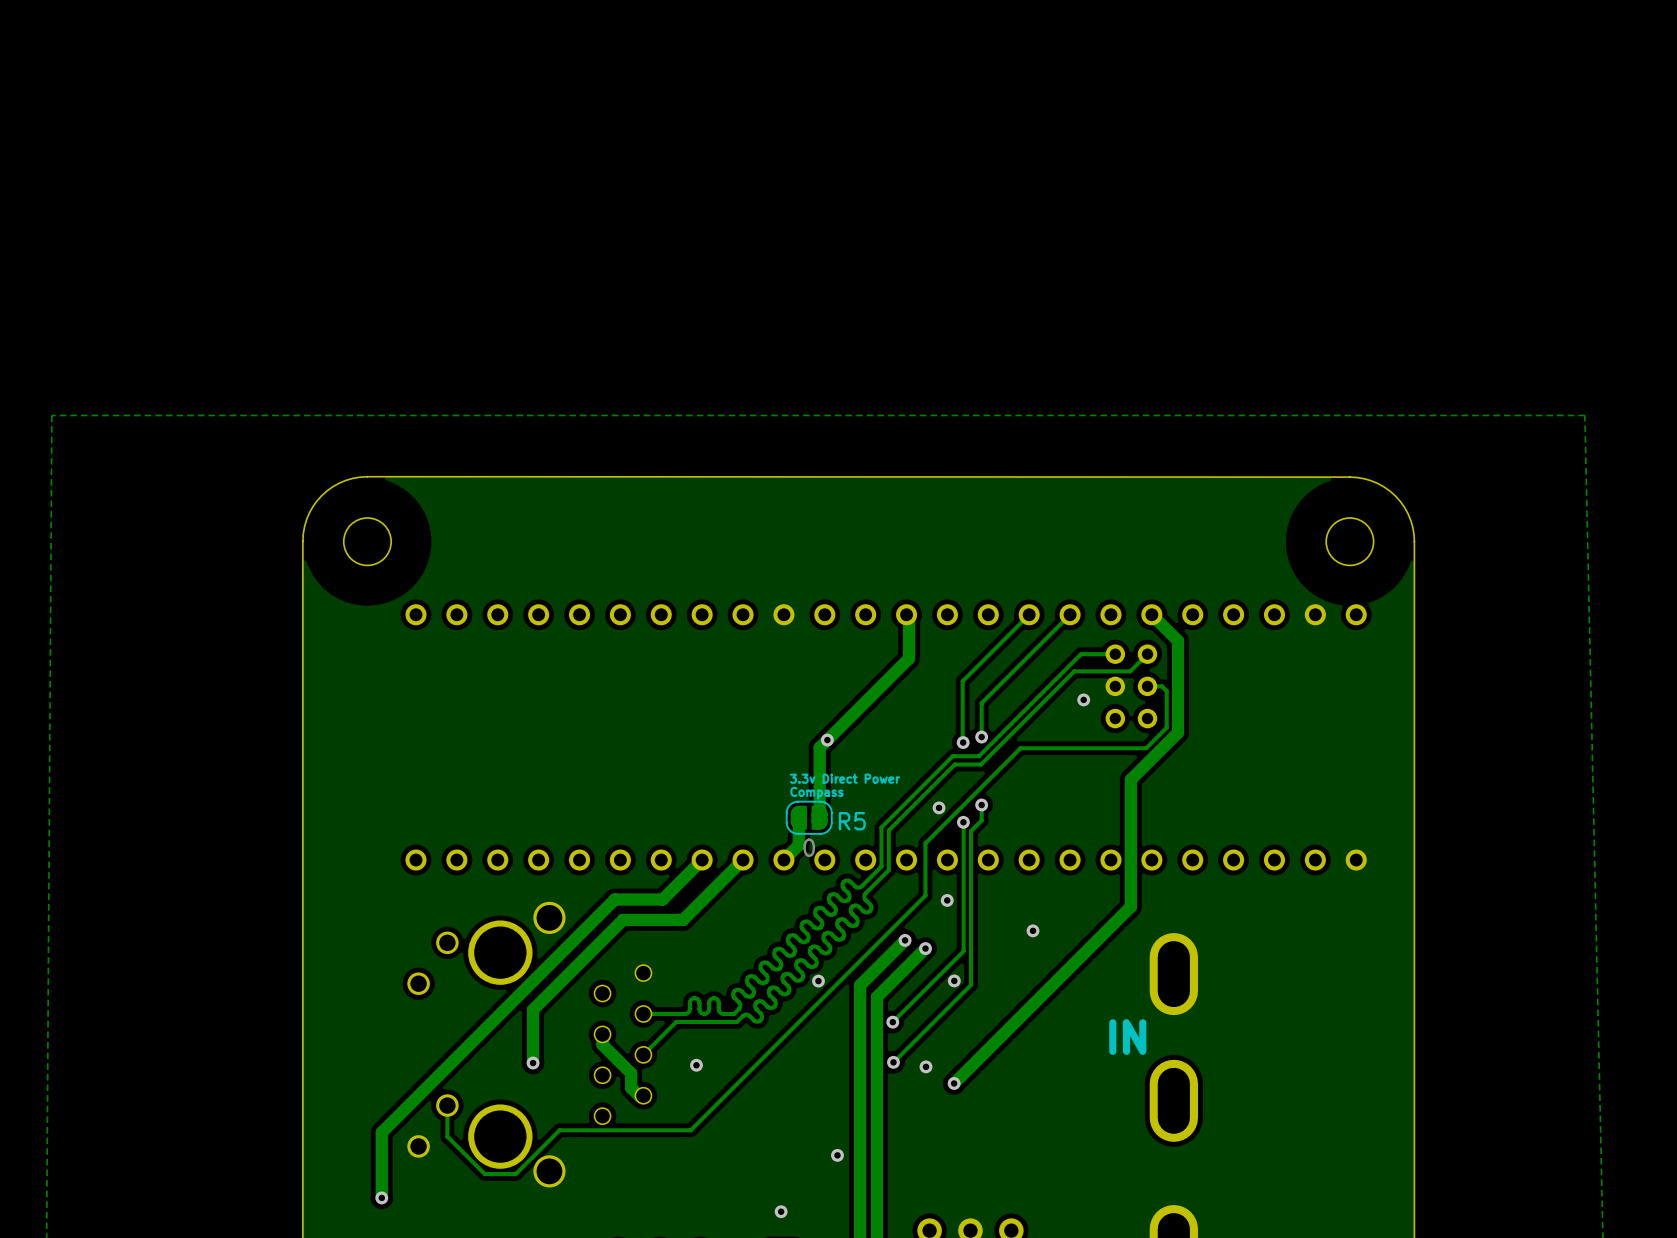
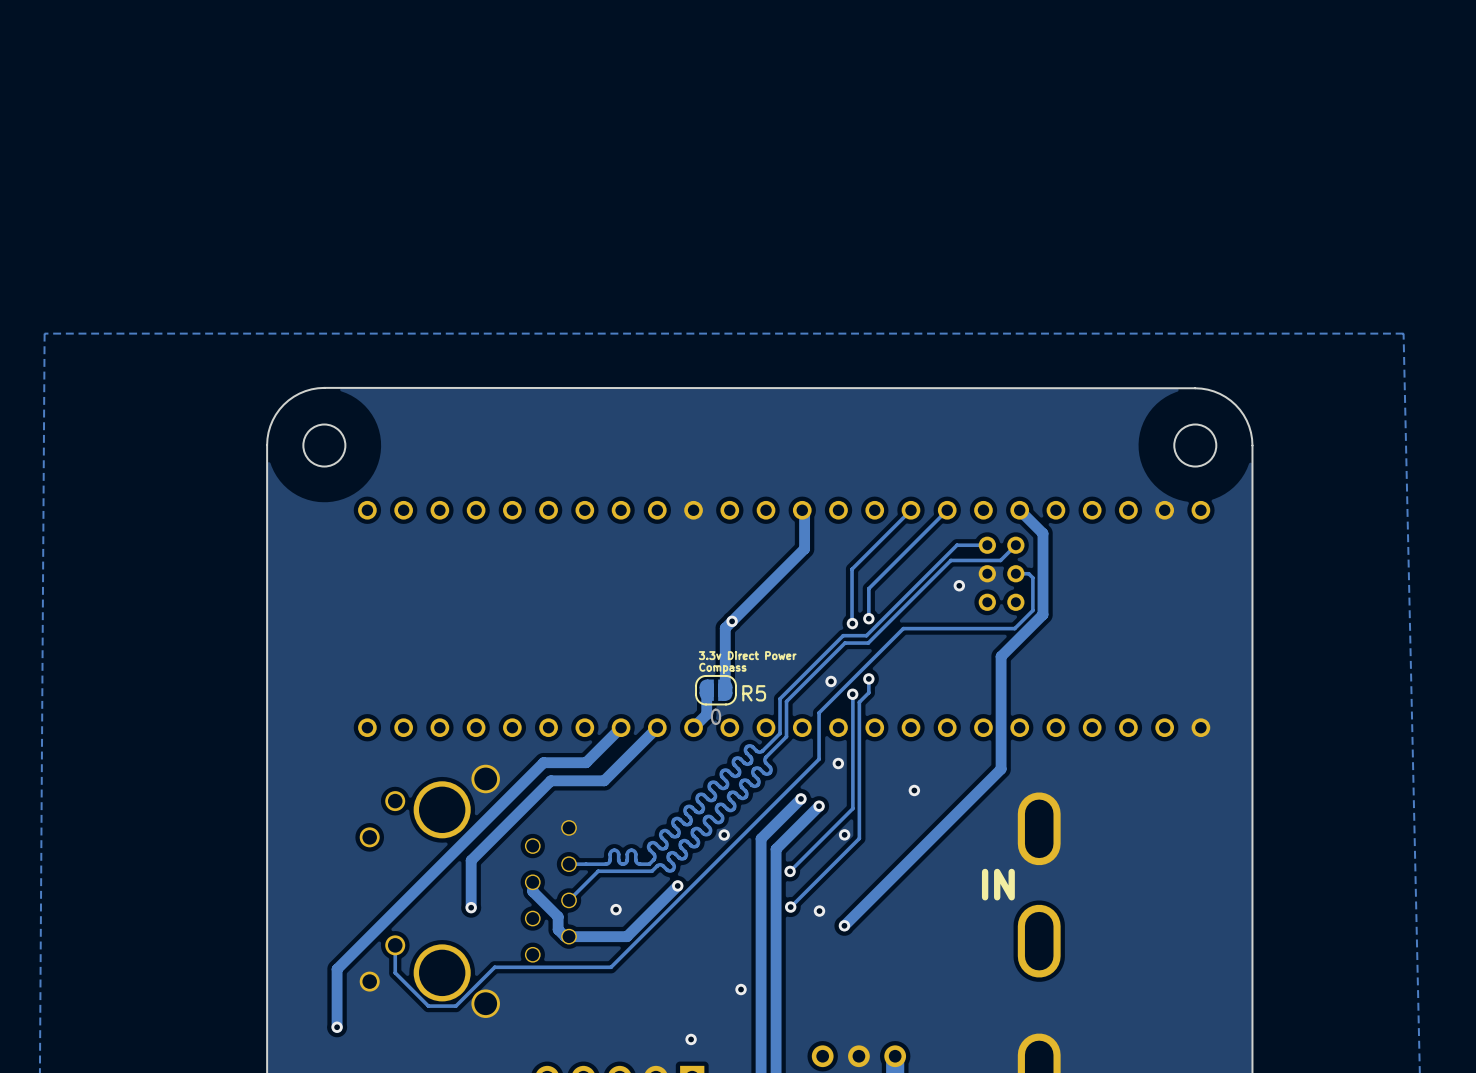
track: none -> (677, 885) (627, 936) (569, 936)
via: none -> (677, 885)

